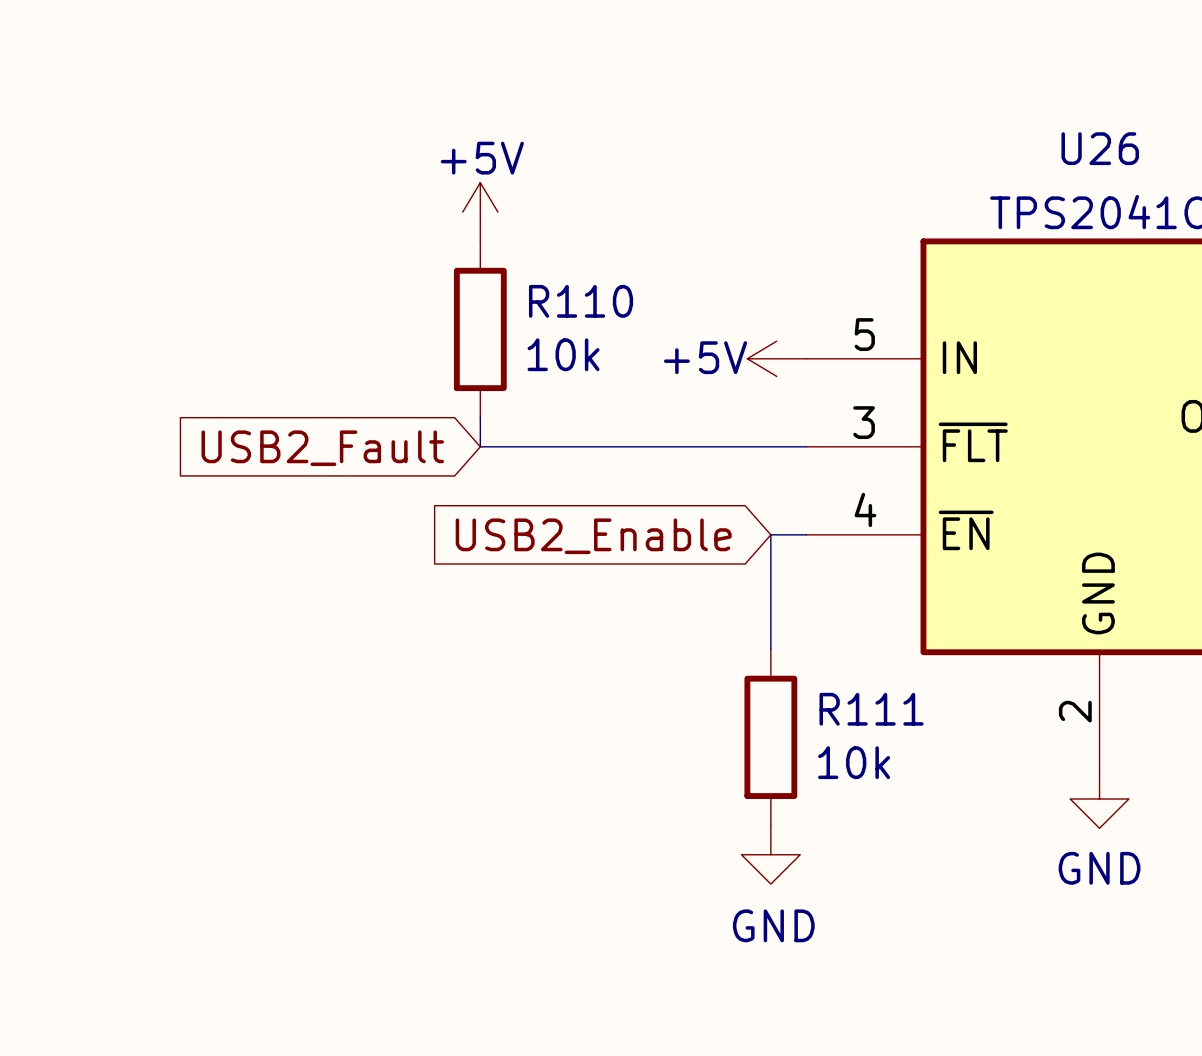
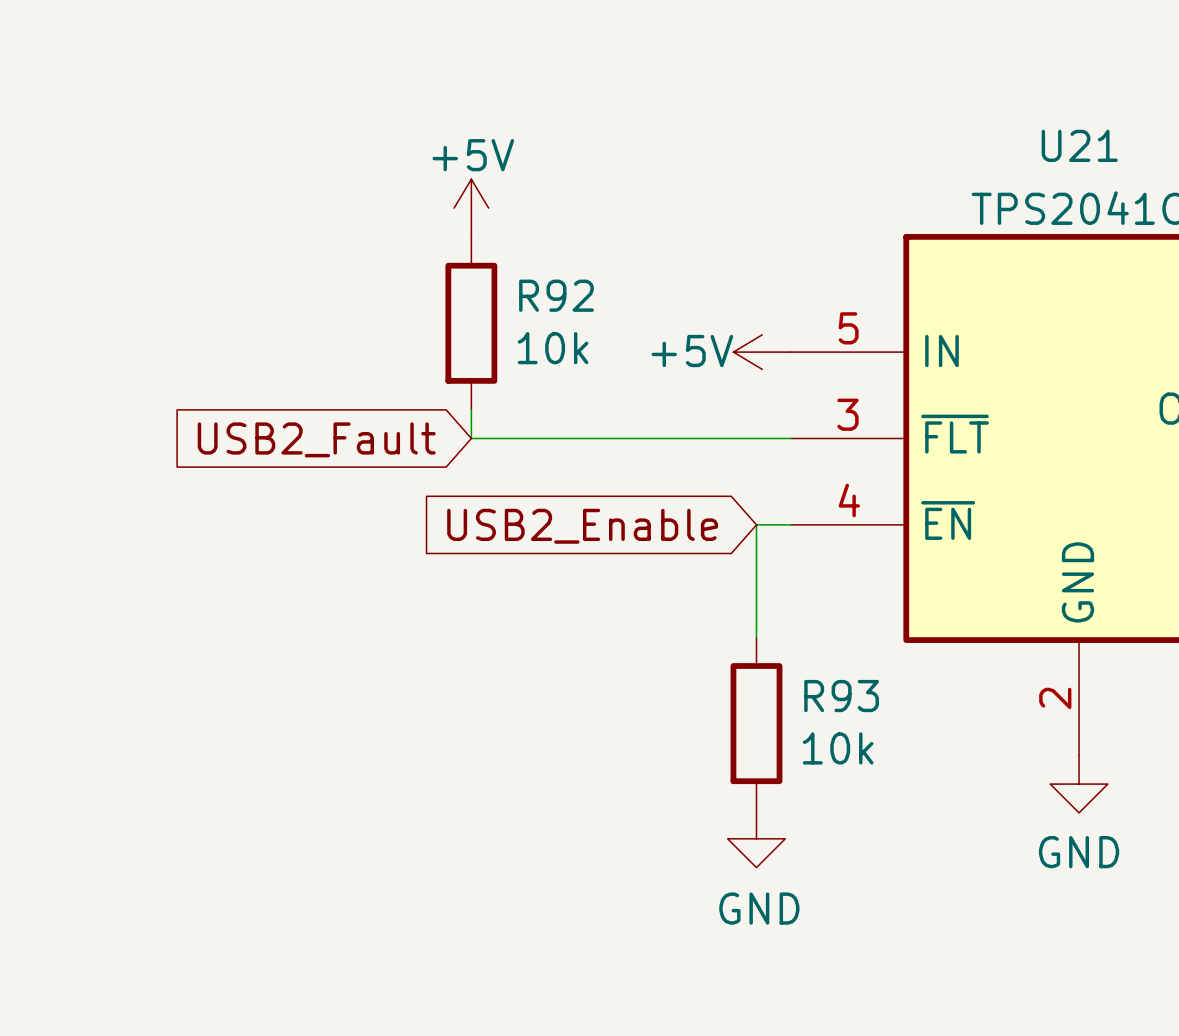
U26 name: U26 (1100, 148) -> U21 (1079, 145)
R110 name: R110 (581, 301) -> R92 (556, 295)
R111 name: R111 (871, 709) -> R93 (841, 696)

